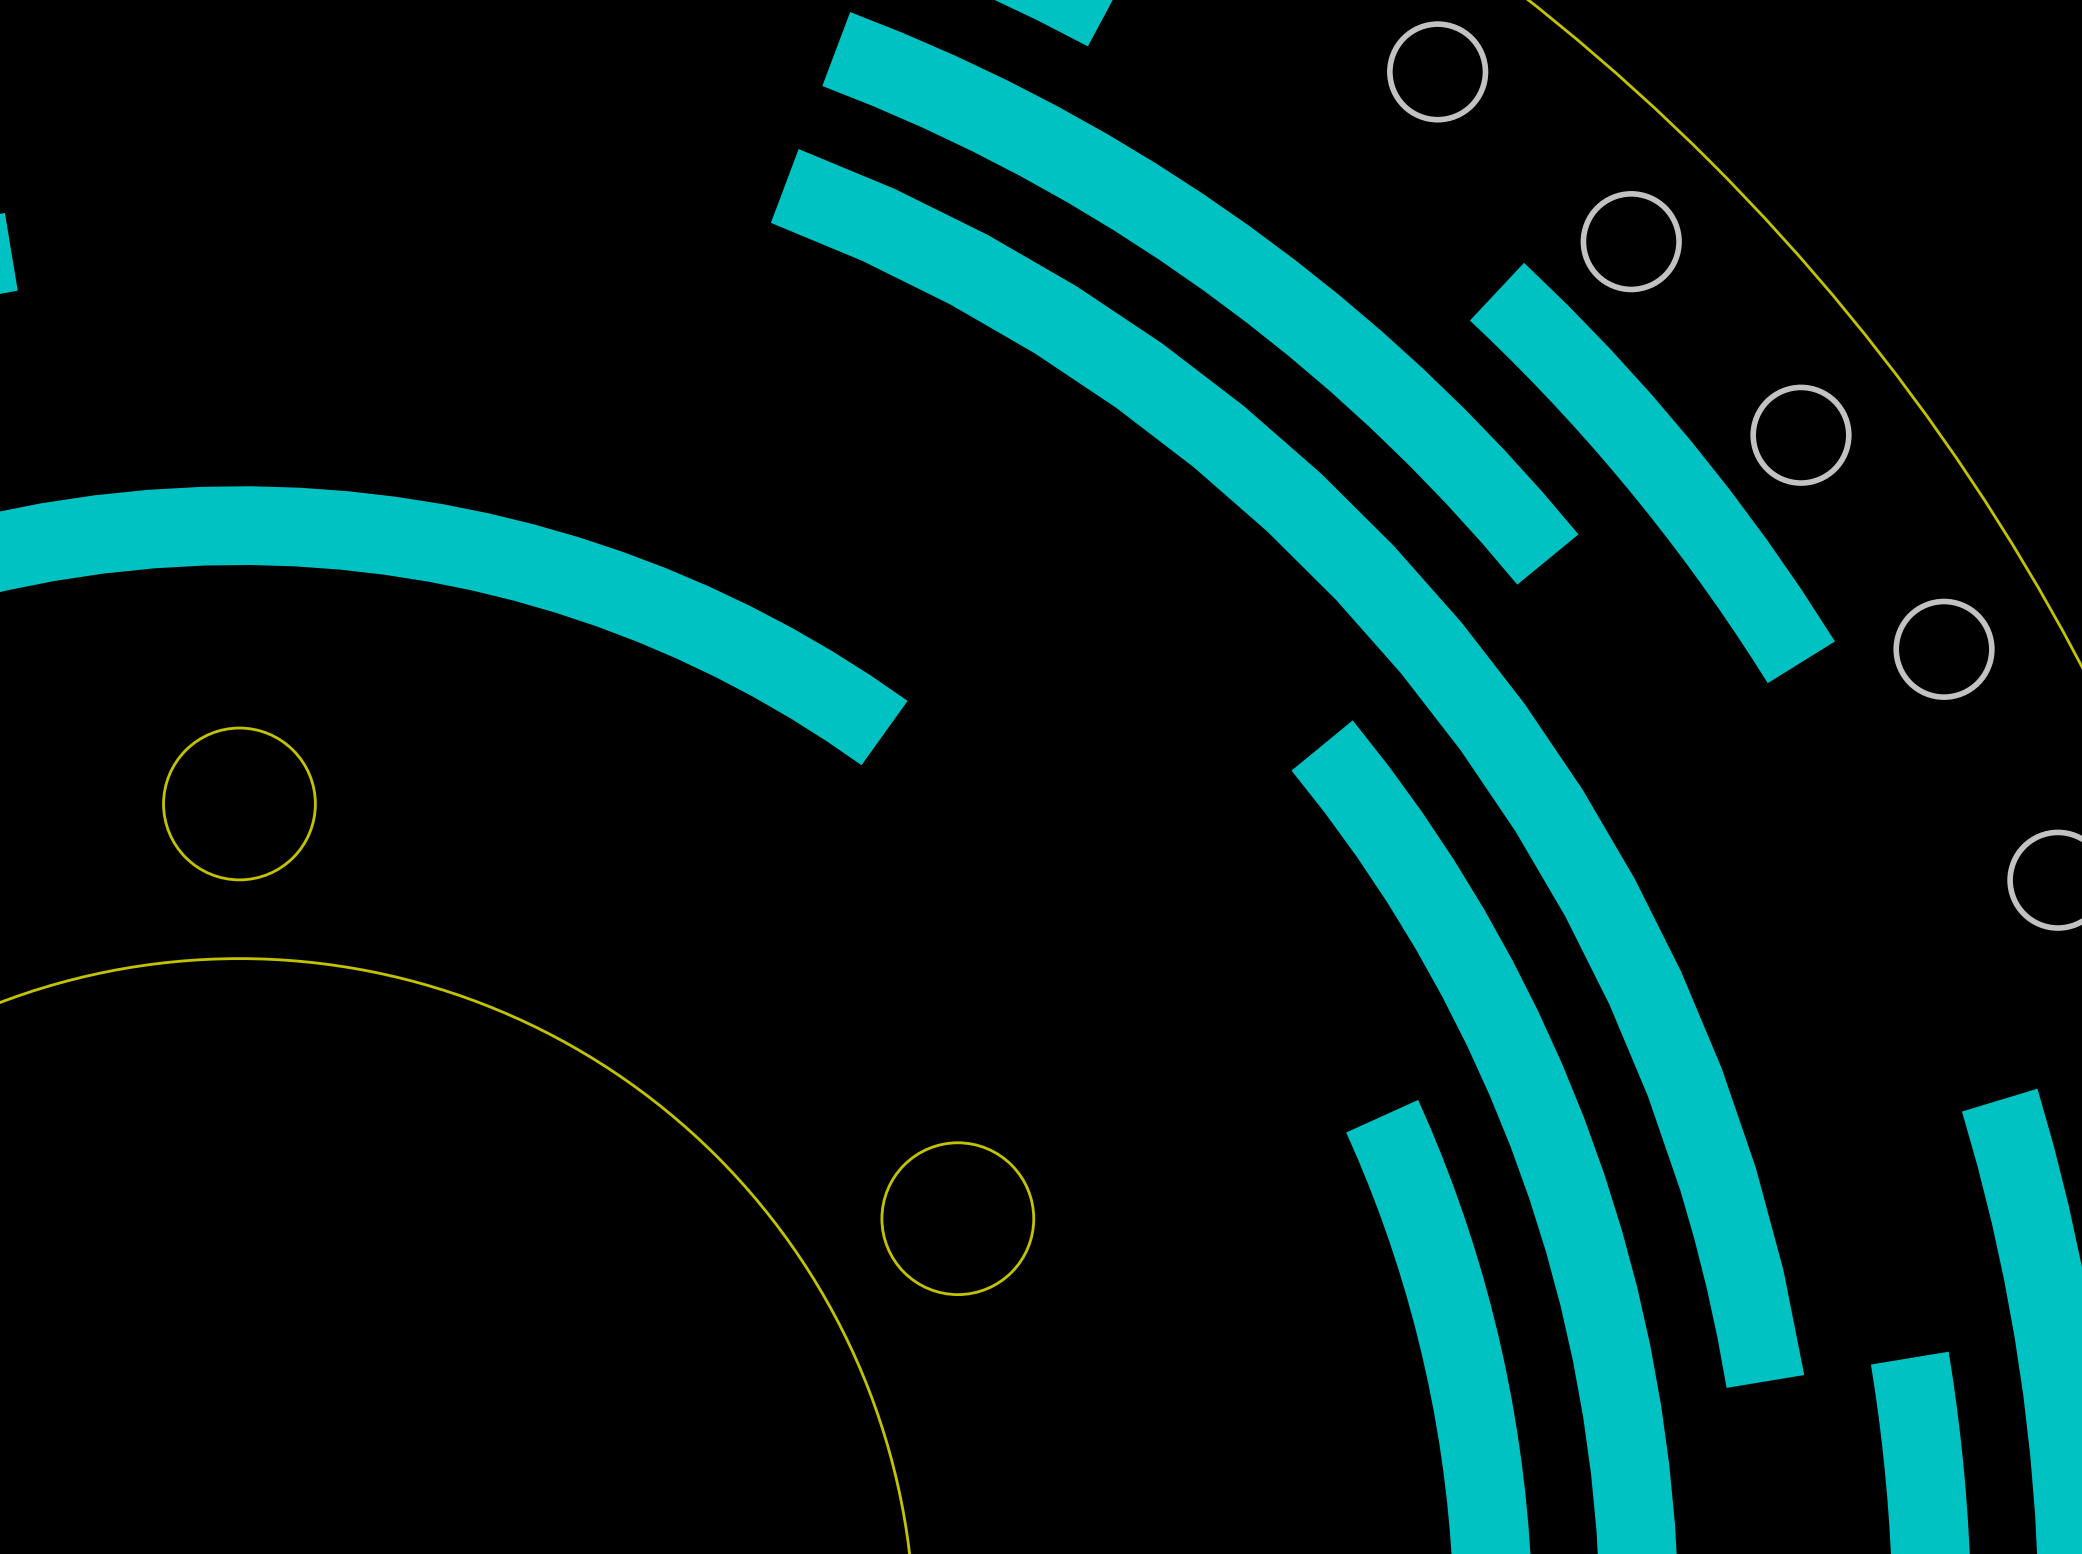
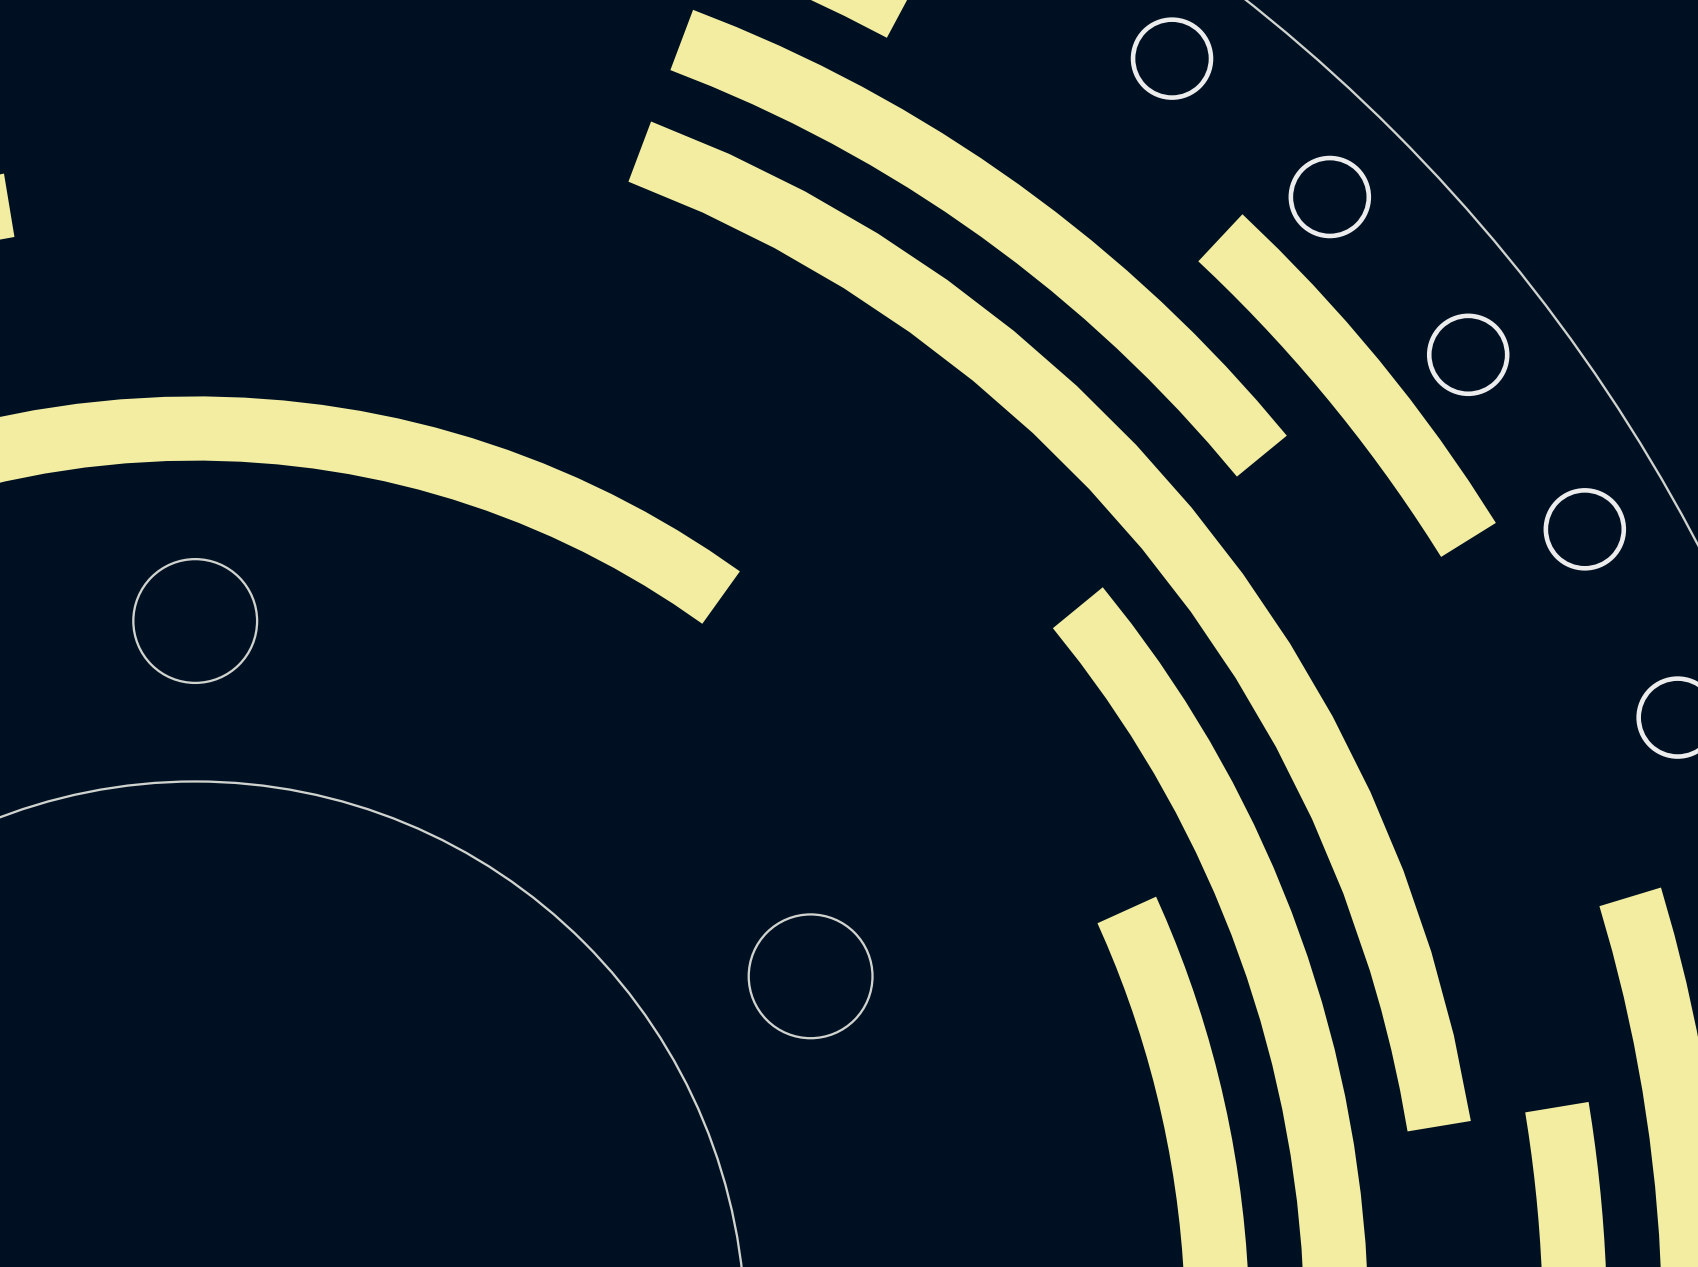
round board edge position: (239, 803) -> (195, 621)
round board edge position: (957, 1218) -> (810, 976)

